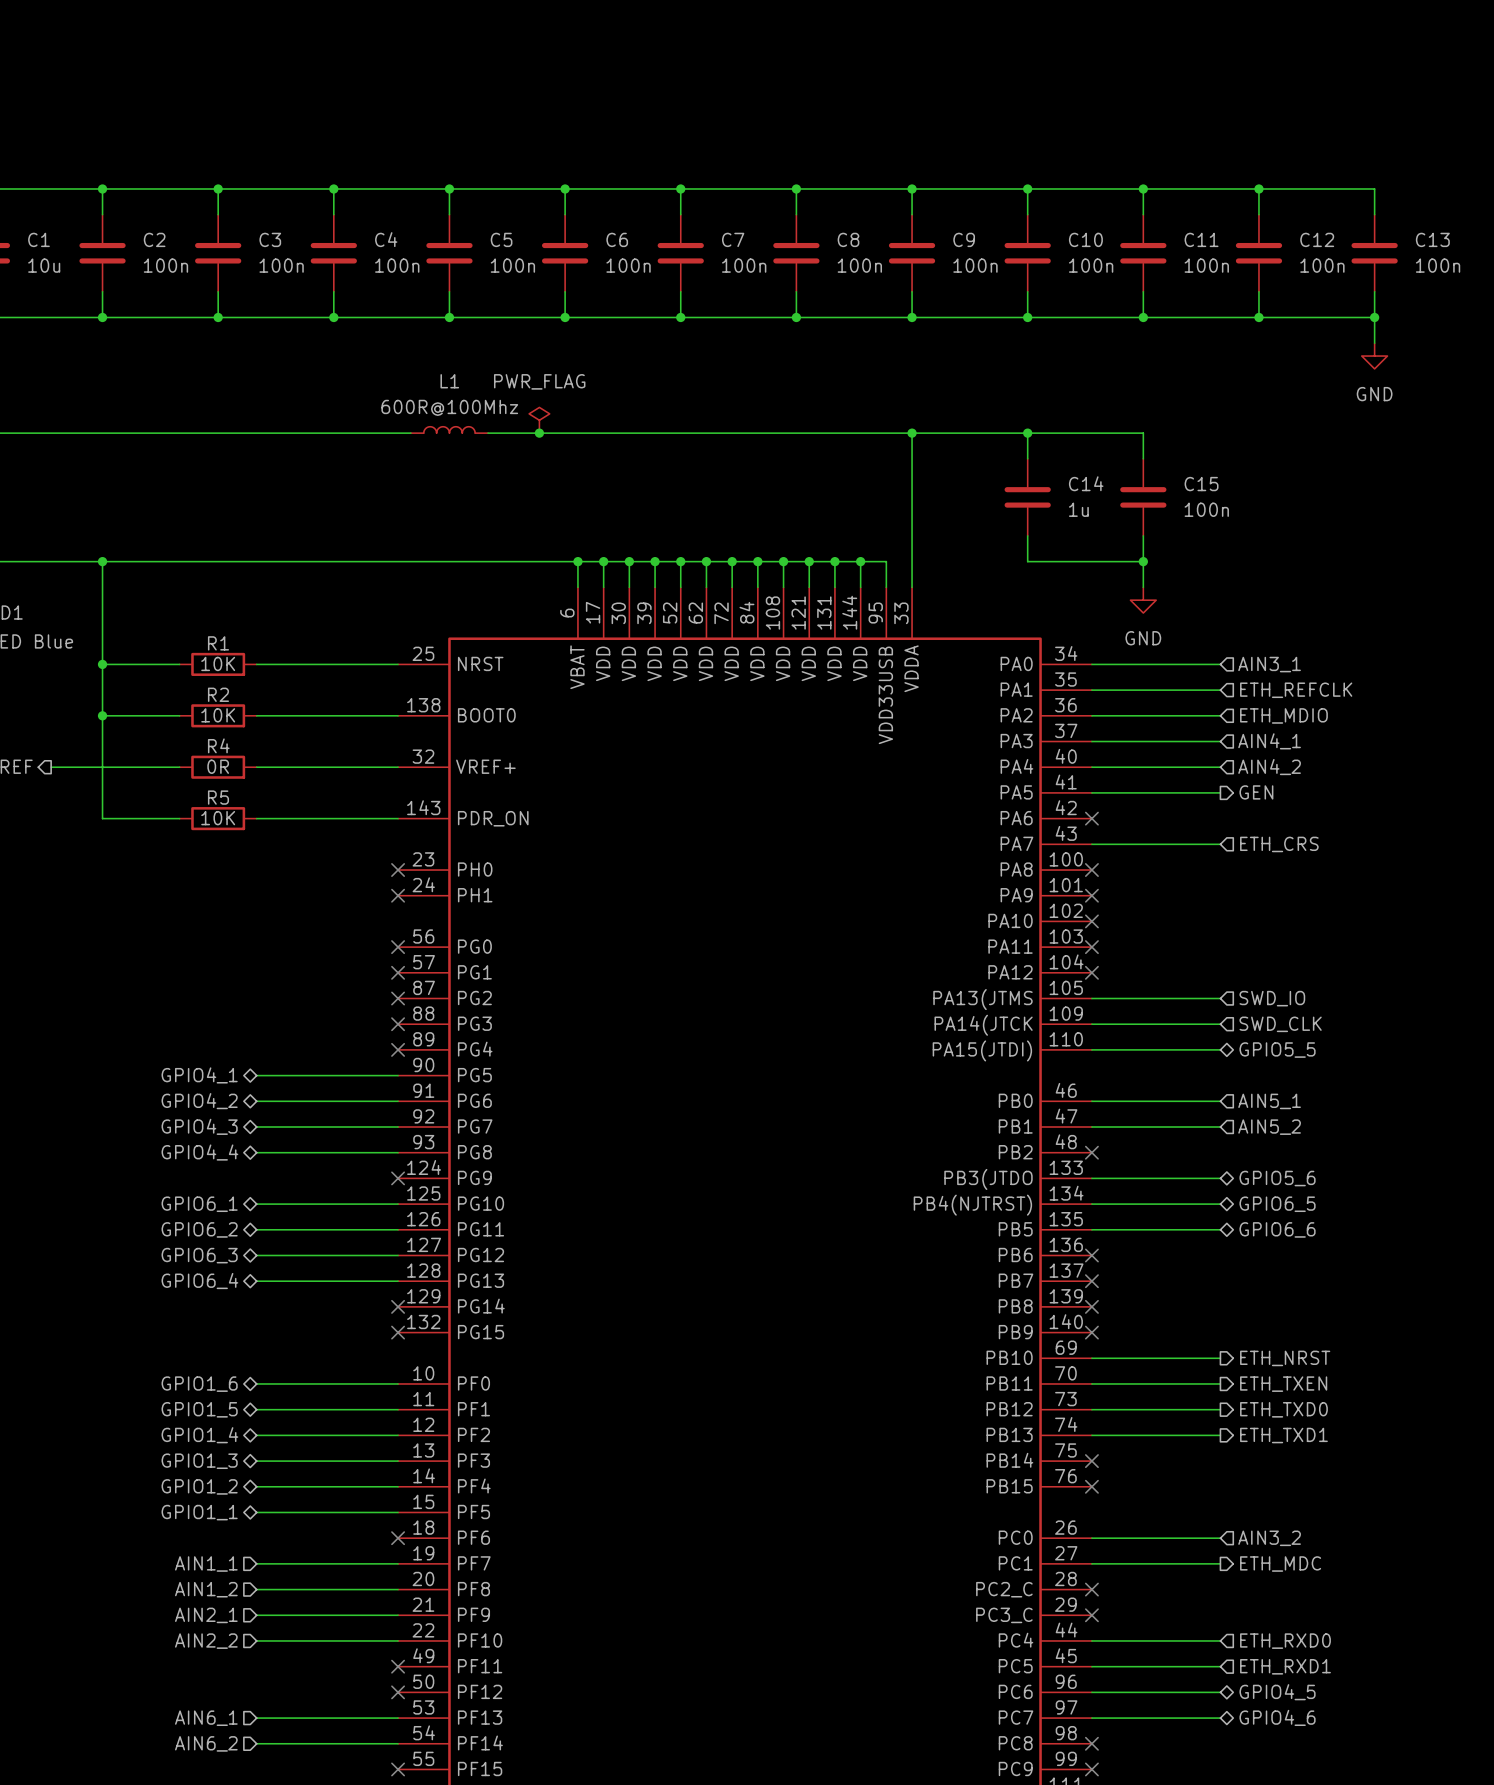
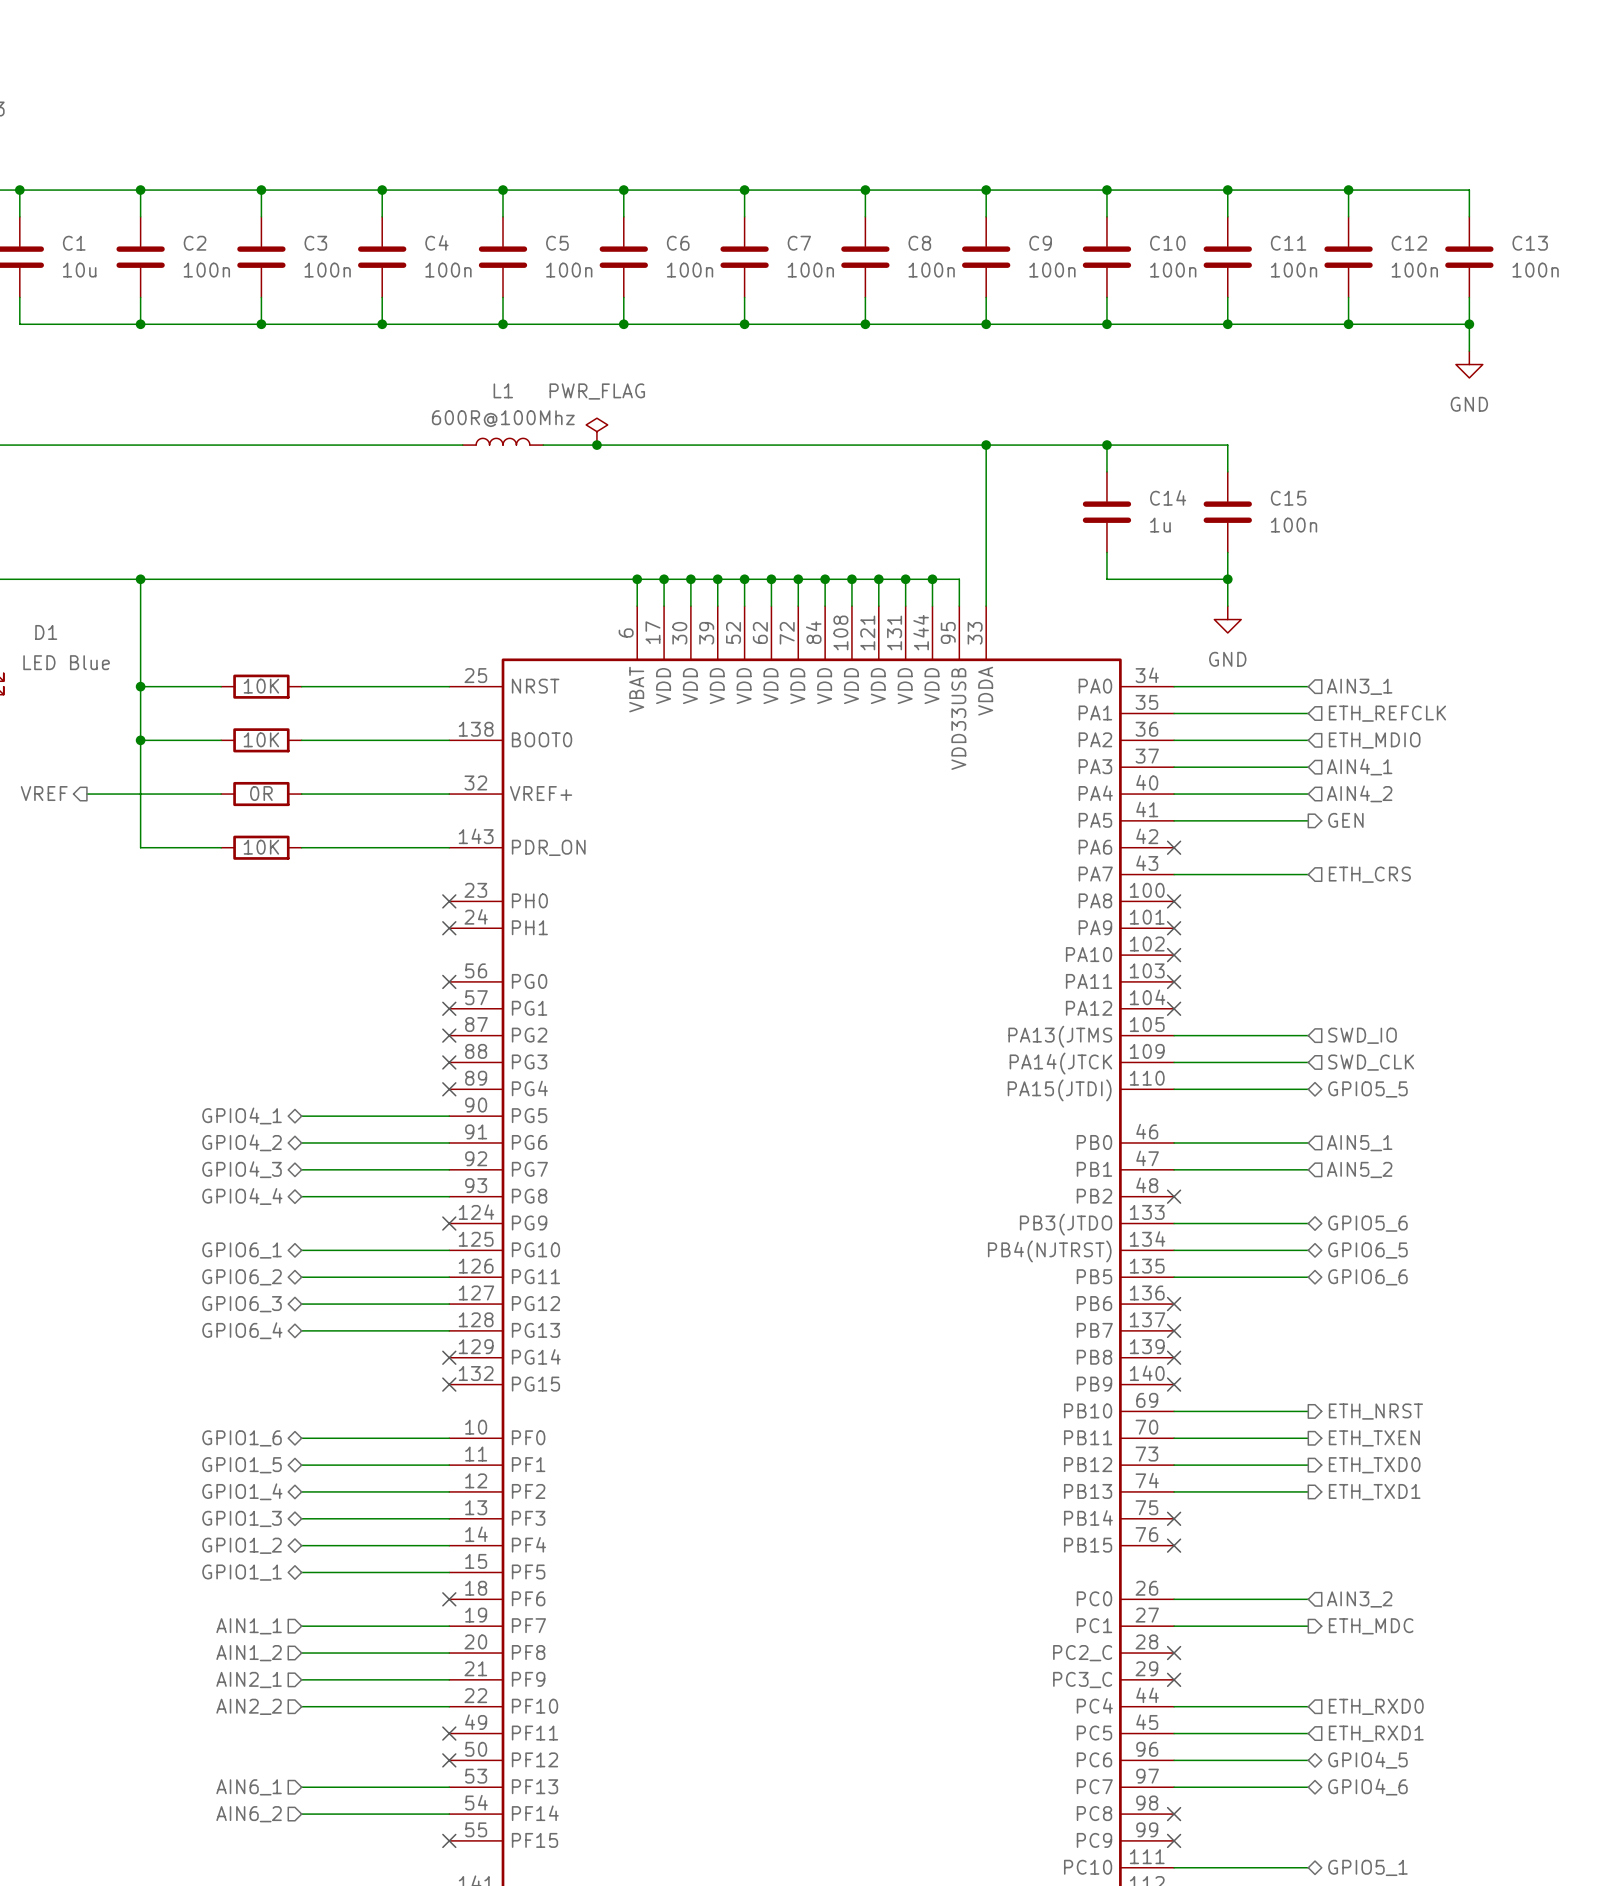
R1 name: R1 (218, 643) -> none
R2 name: R2 (218, 694) -> none
R4 name: R4 (218, 745) -> none
R5 name: R5 (218, 797) -> none

